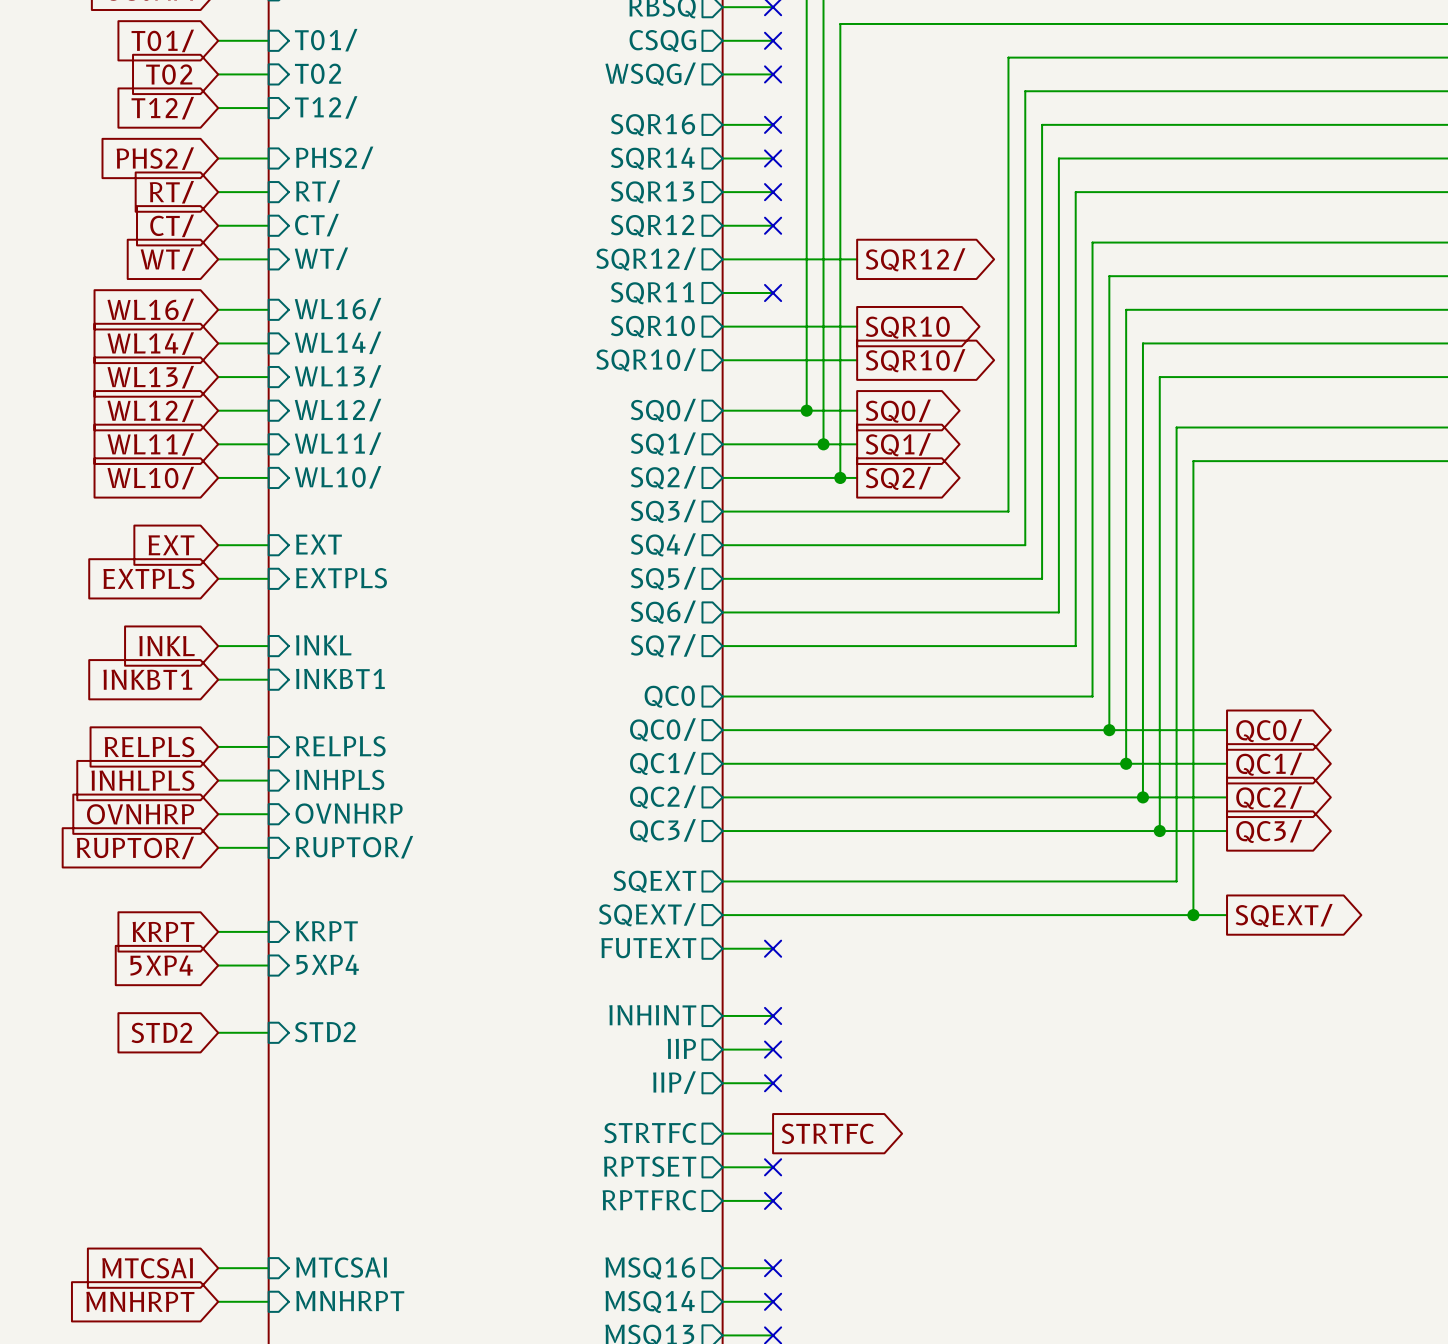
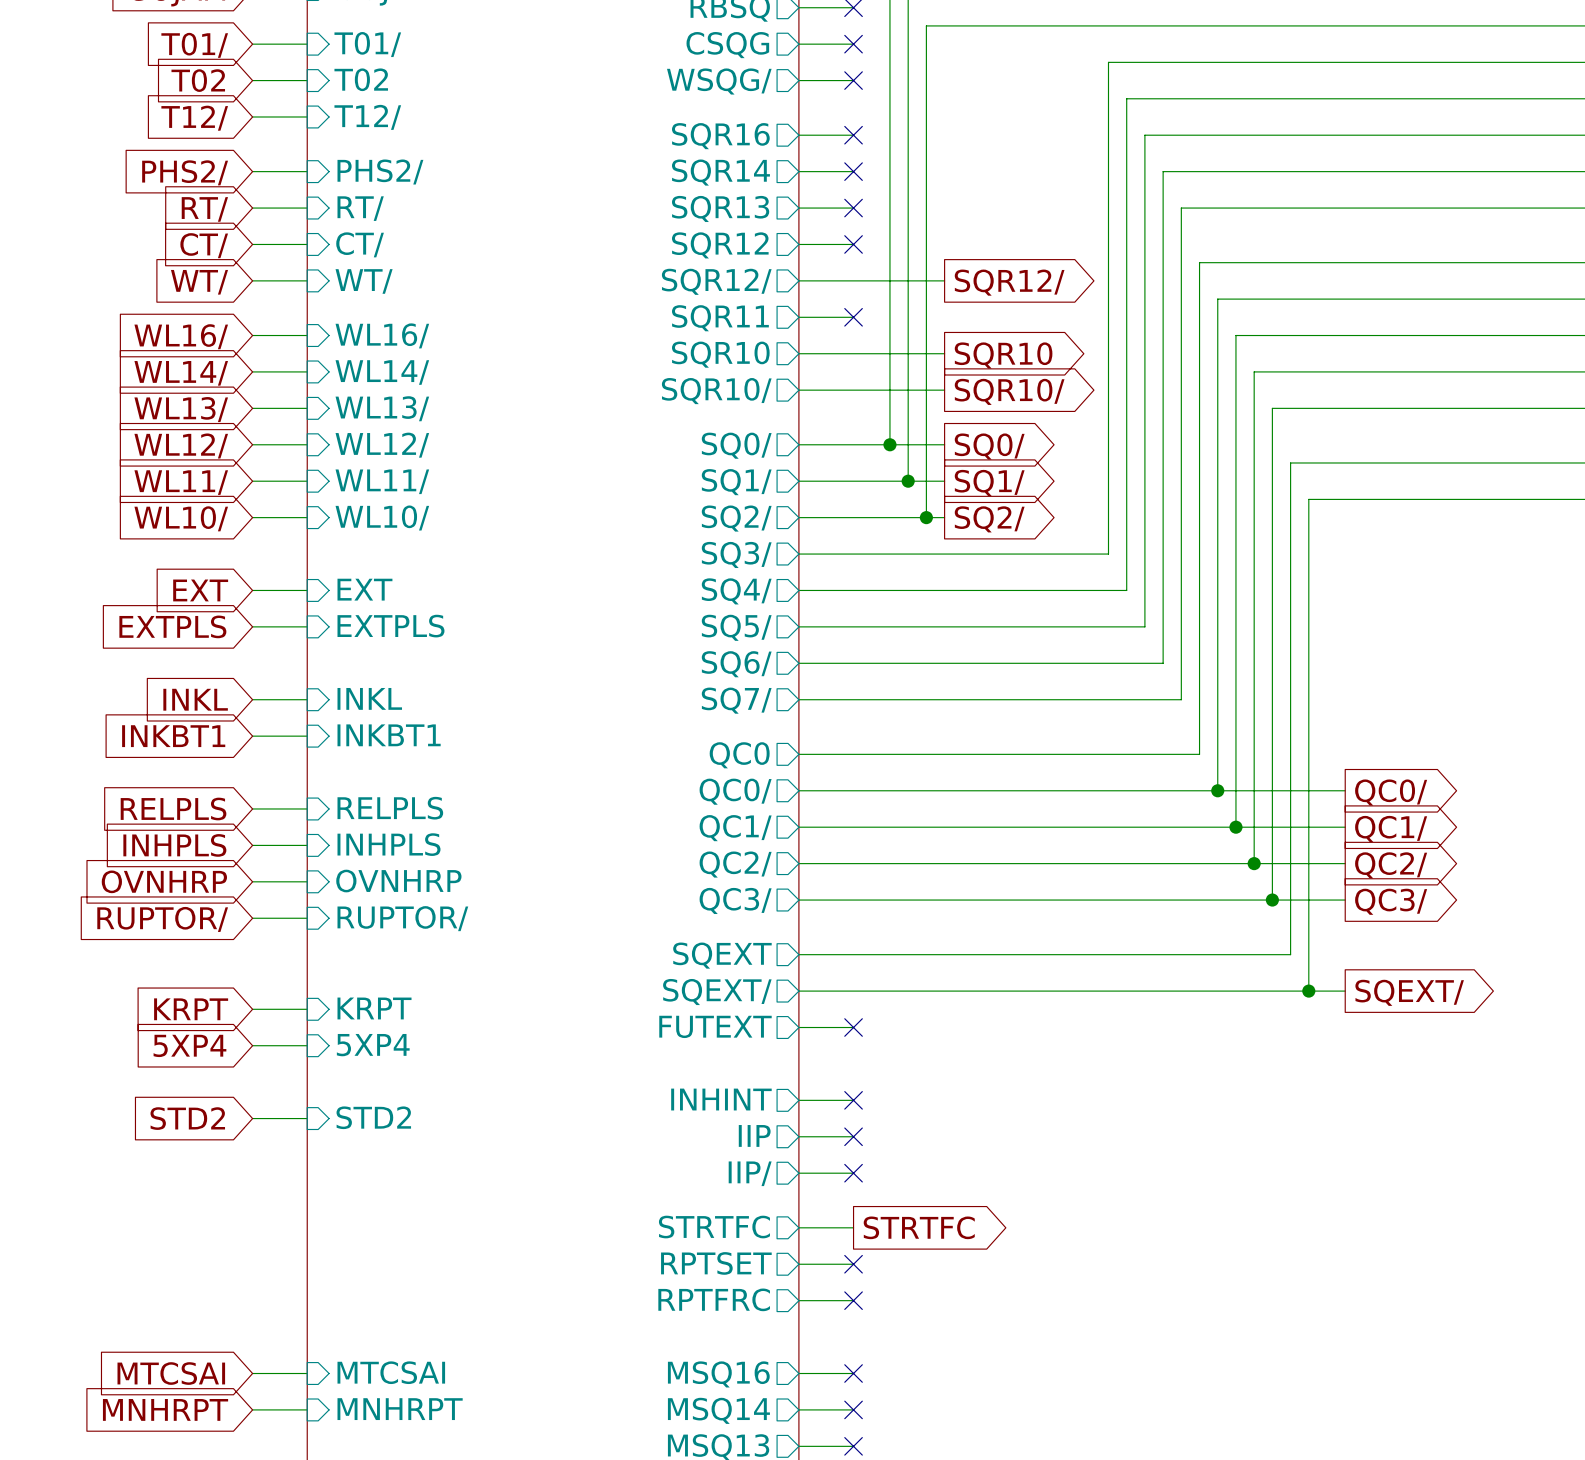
global label: INHLPLS (142, 780) -> INHPLS (174, 845)

